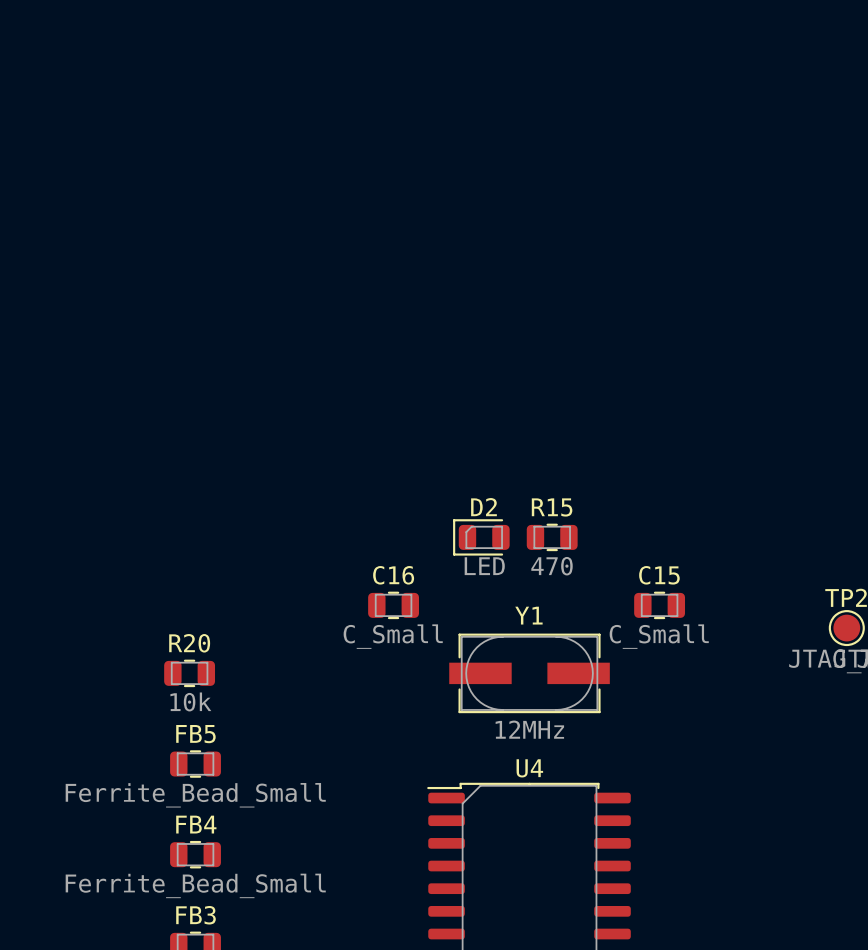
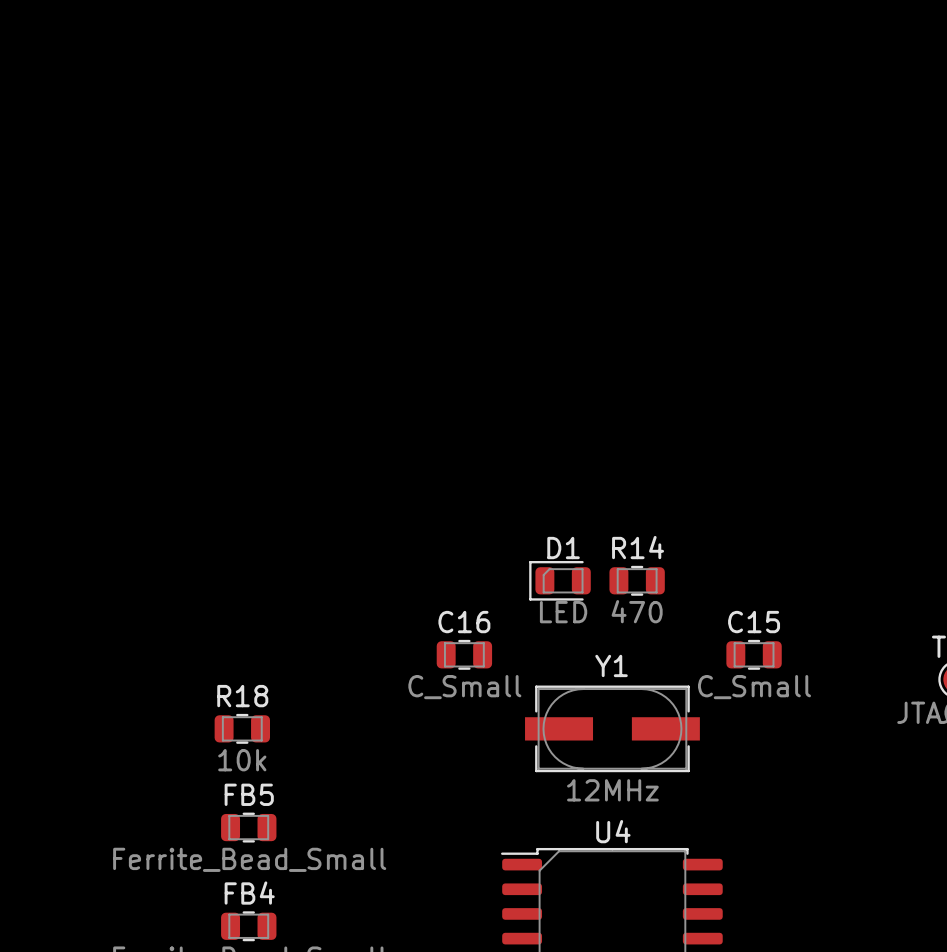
D2 name: D2 (483, 507) -> D1 (563, 548)
R15 name: R15 (552, 507) -> R14 (638, 547)
R20 name: R20 (189, 643) -> R18 (242, 696)

